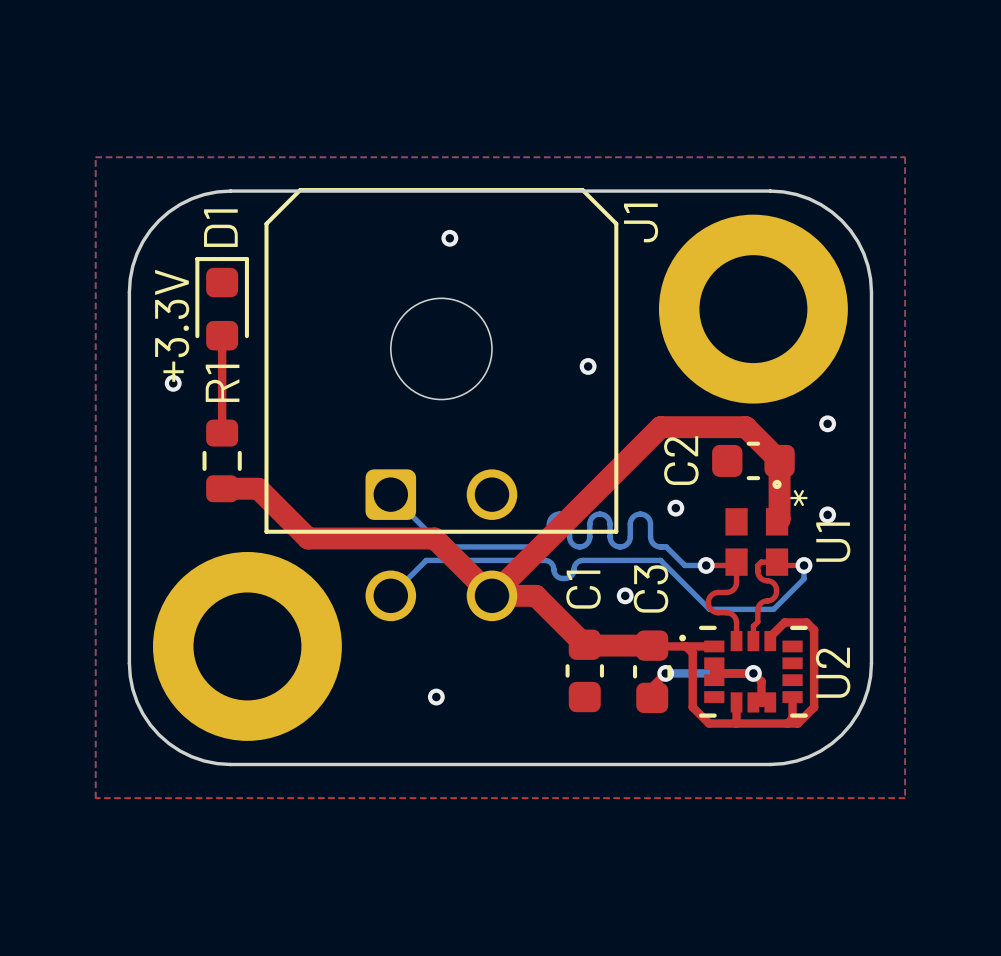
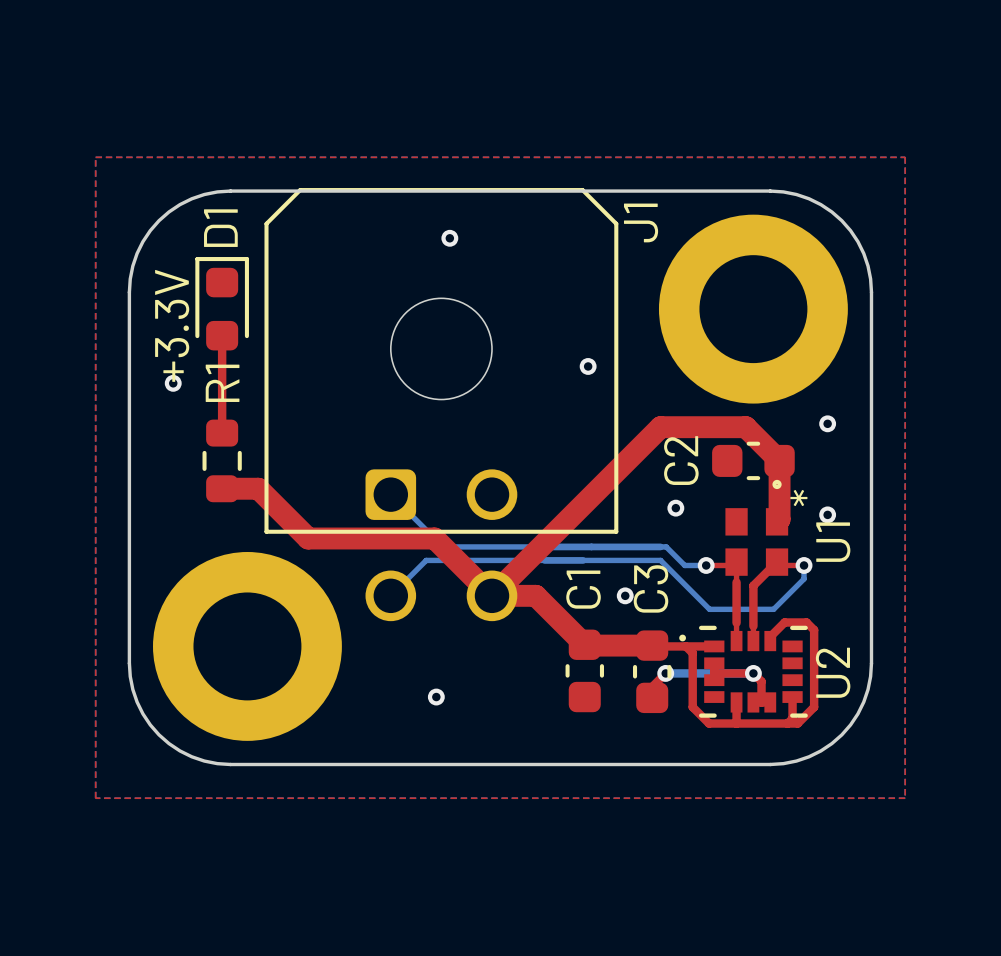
bottom track: (539, 546) (544, 545) (548, 540) (550, 519) (559, 514) (568, 519) (569, 539) (577, 546) (582, 546) (587, 542) (590, 520) (594, 515) (599, 514) (606, 516) (609, 520) (612, 542) (618, 546) (625, 545) (629, 539) (631, 520) (635, 515) (640, 514) (649, 519) (651, 540) (654, 544) (660, 546) -> (539, 546) (660, 546)
bottom track: (544, 560) (551, 563) (556, 575) (562, 578) (571, 575) (575, 563) (583, 560) -> (544, 560) (583, 560)
top track: (777, 562) (761, 562) (757, 565) (759, 577) (773, 583) (776, 592) (772, 599) (759, 604) (757, 621) (753, 626) -> (777, 562) (753, 585) (753, 626)
top track: (736, 582) (732, 590) (713, 593) (708, 602) (713, 611) (732, 614) (736, 622) -> (736, 582) (736, 622)

